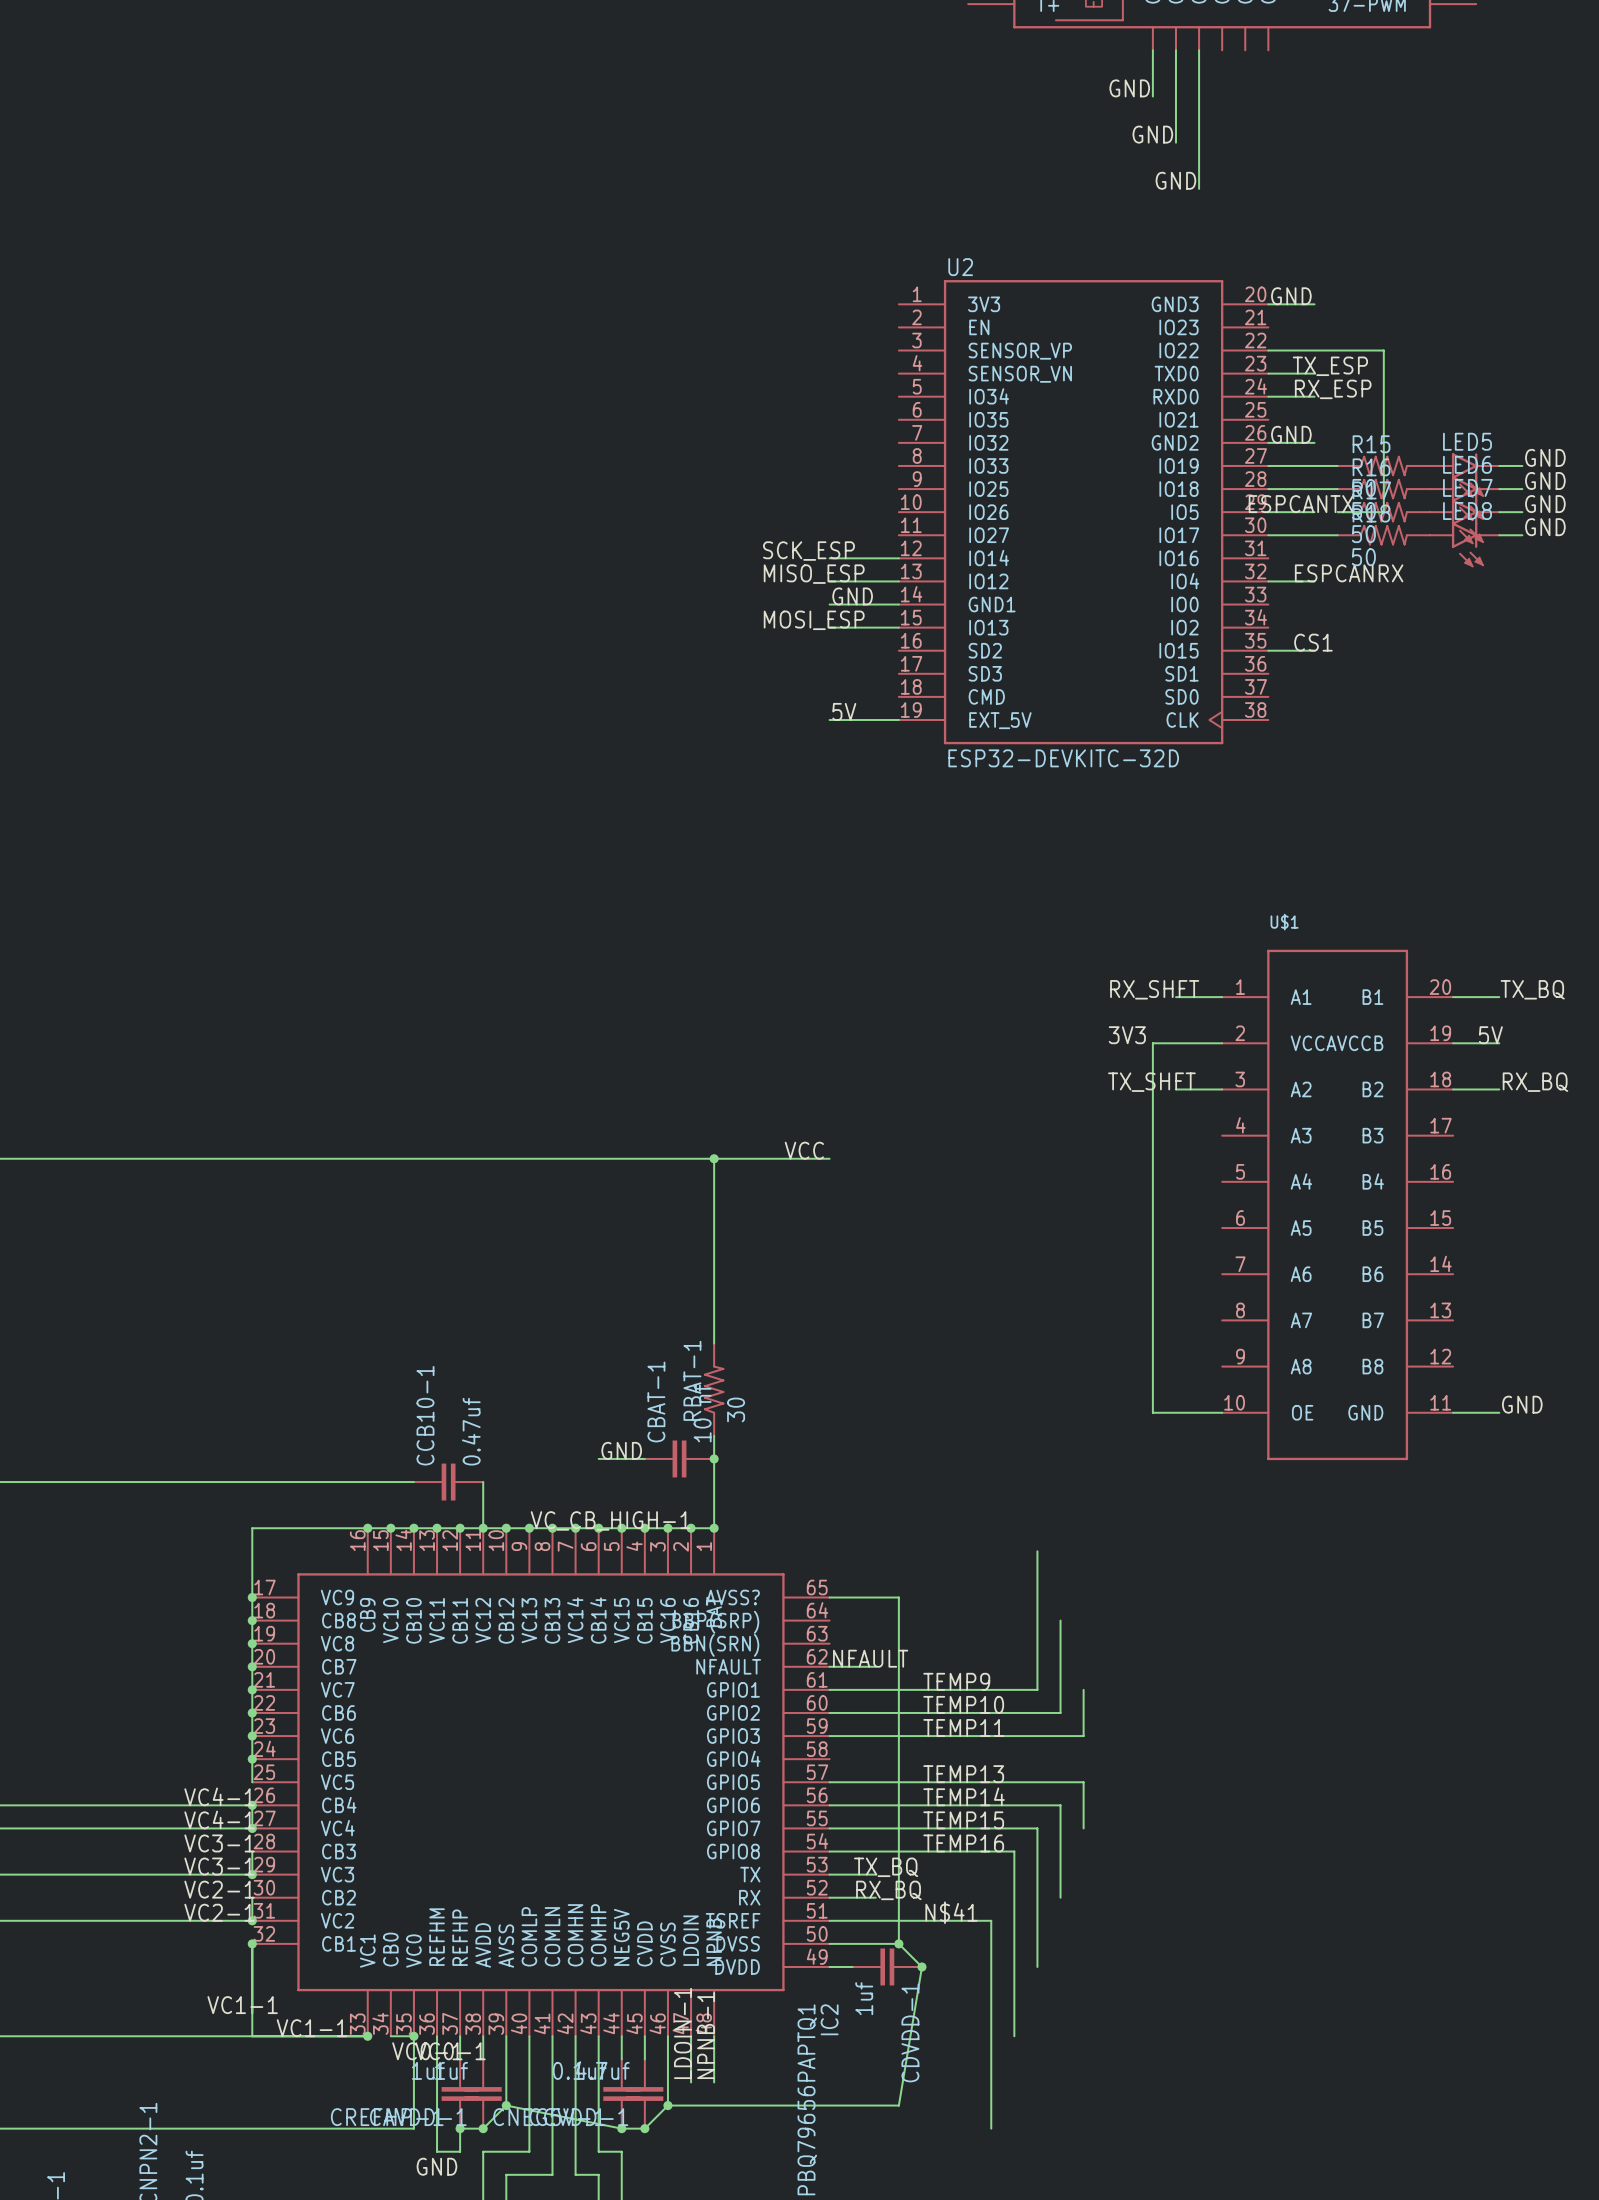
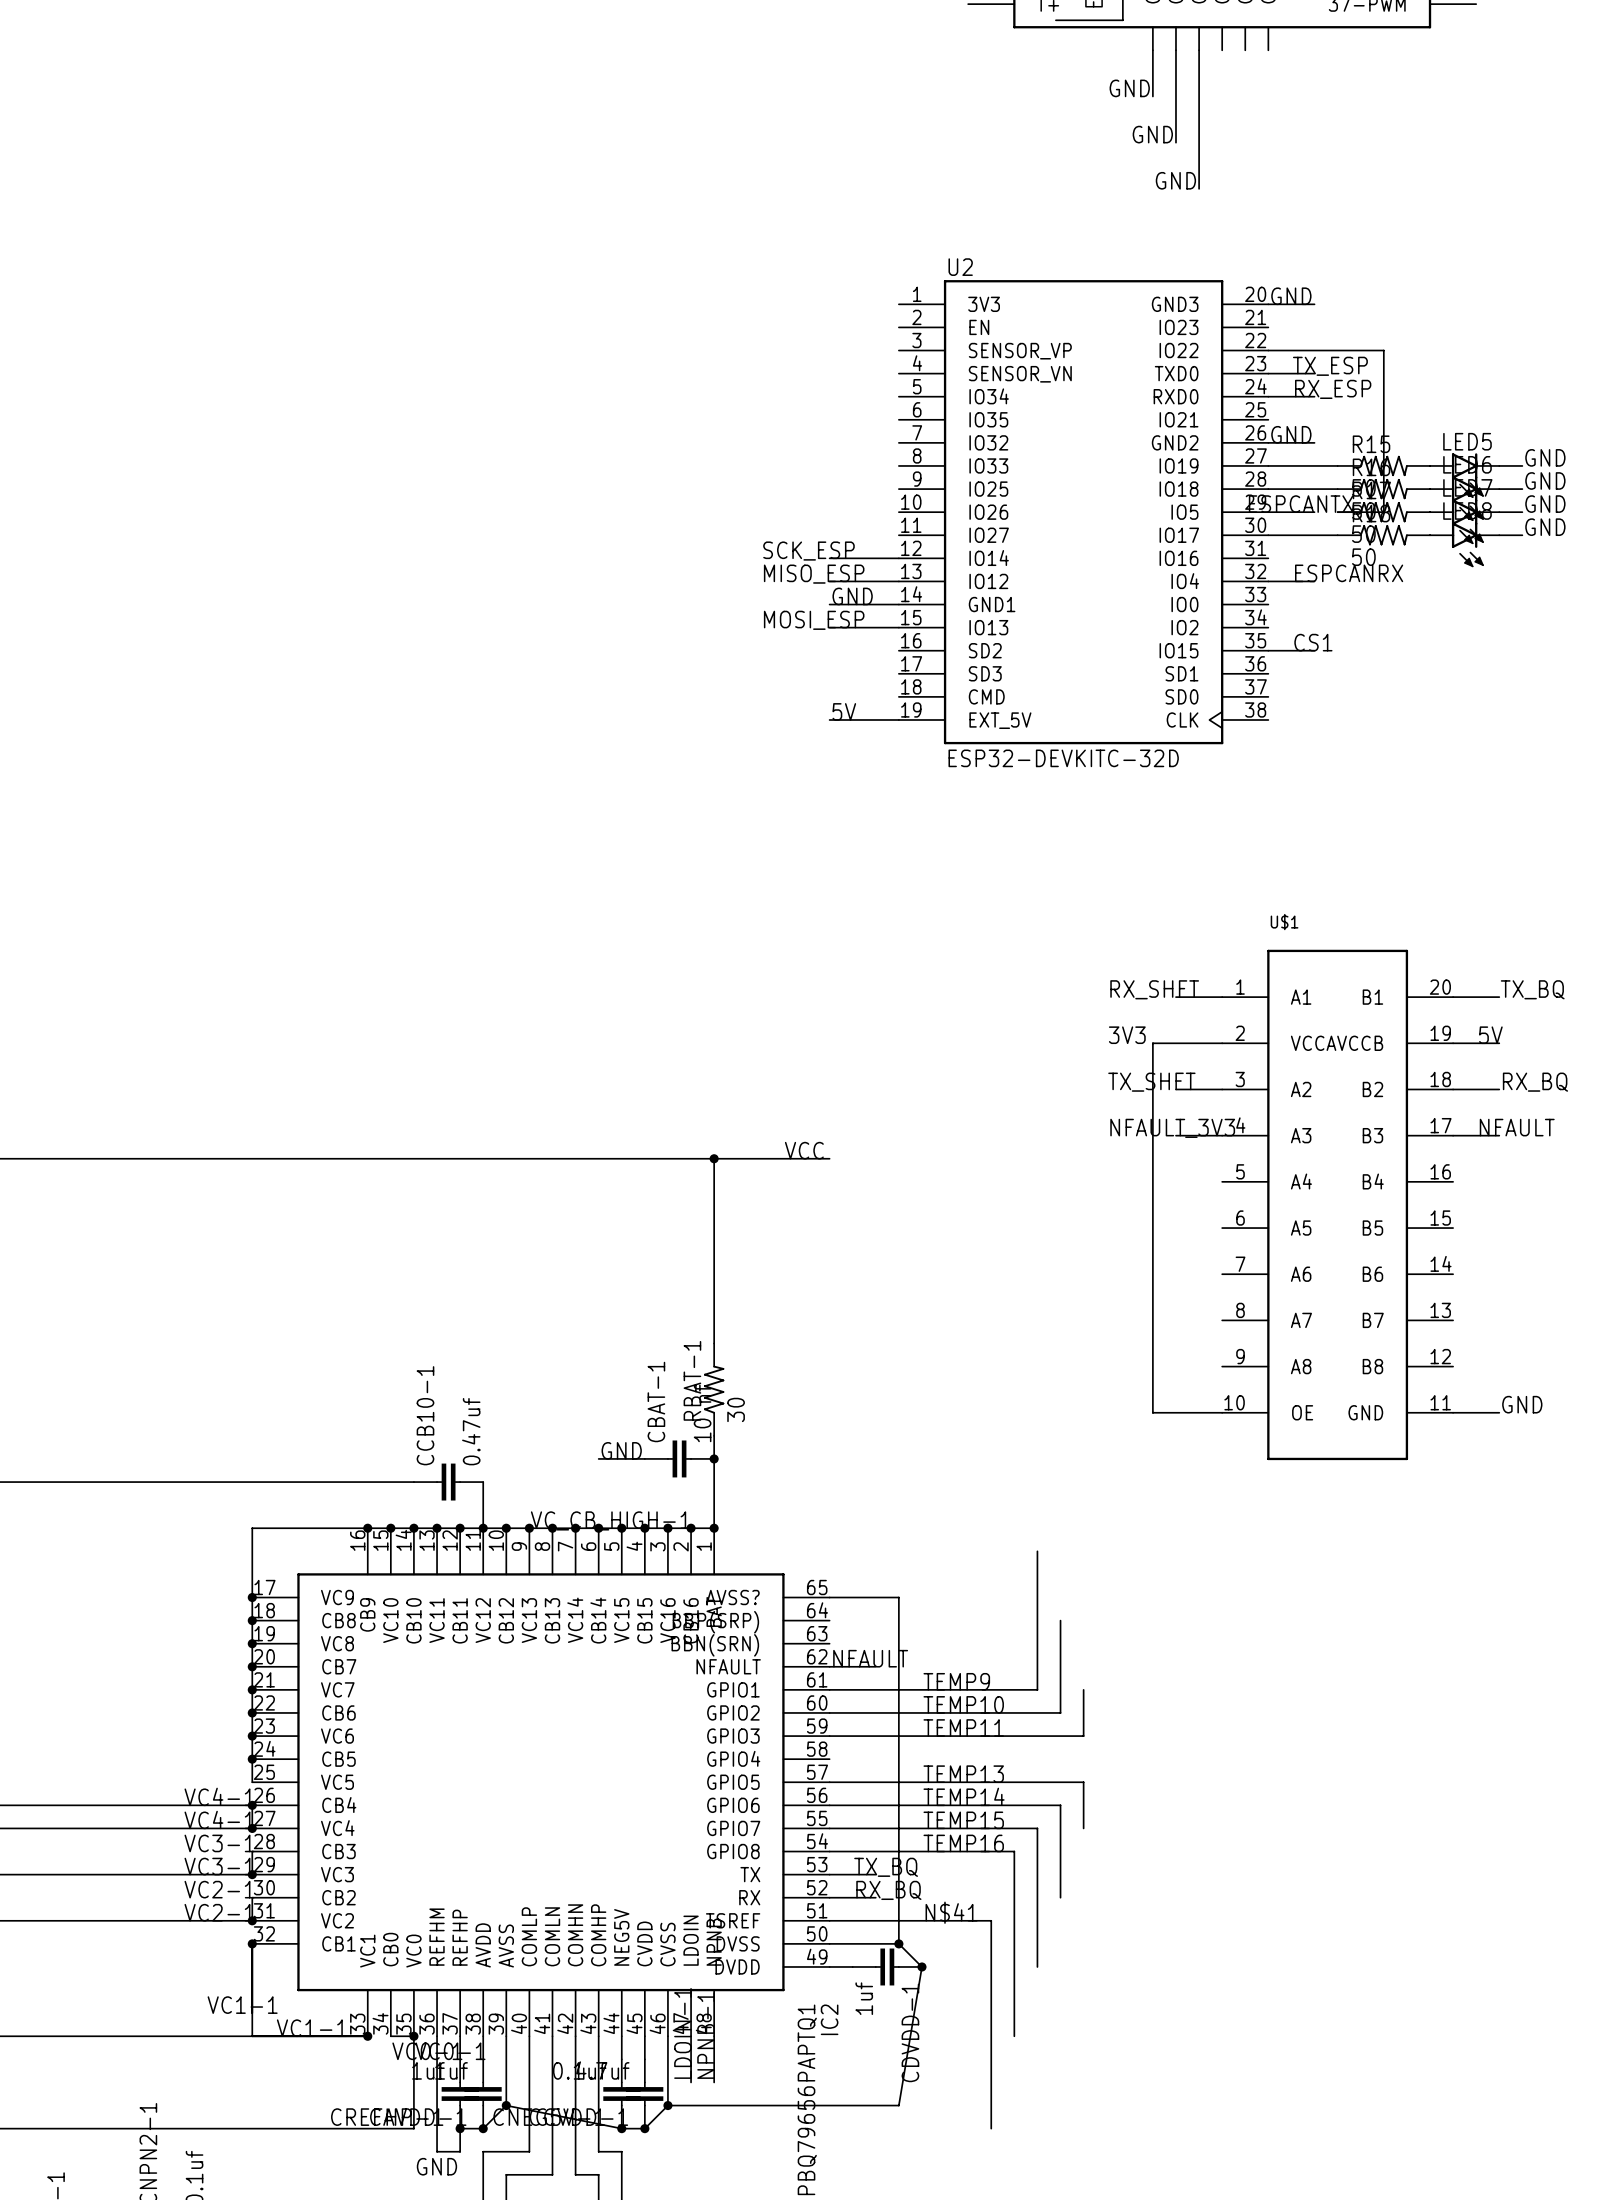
label: none -> NFAULT (1517, 1127)
label: none -> NFAULT_3V3 (1172, 1128)
wire: none -> (1175, 1135) (1222, 1135)
wire: none -> (1453, 1135) (1499, 1135)

